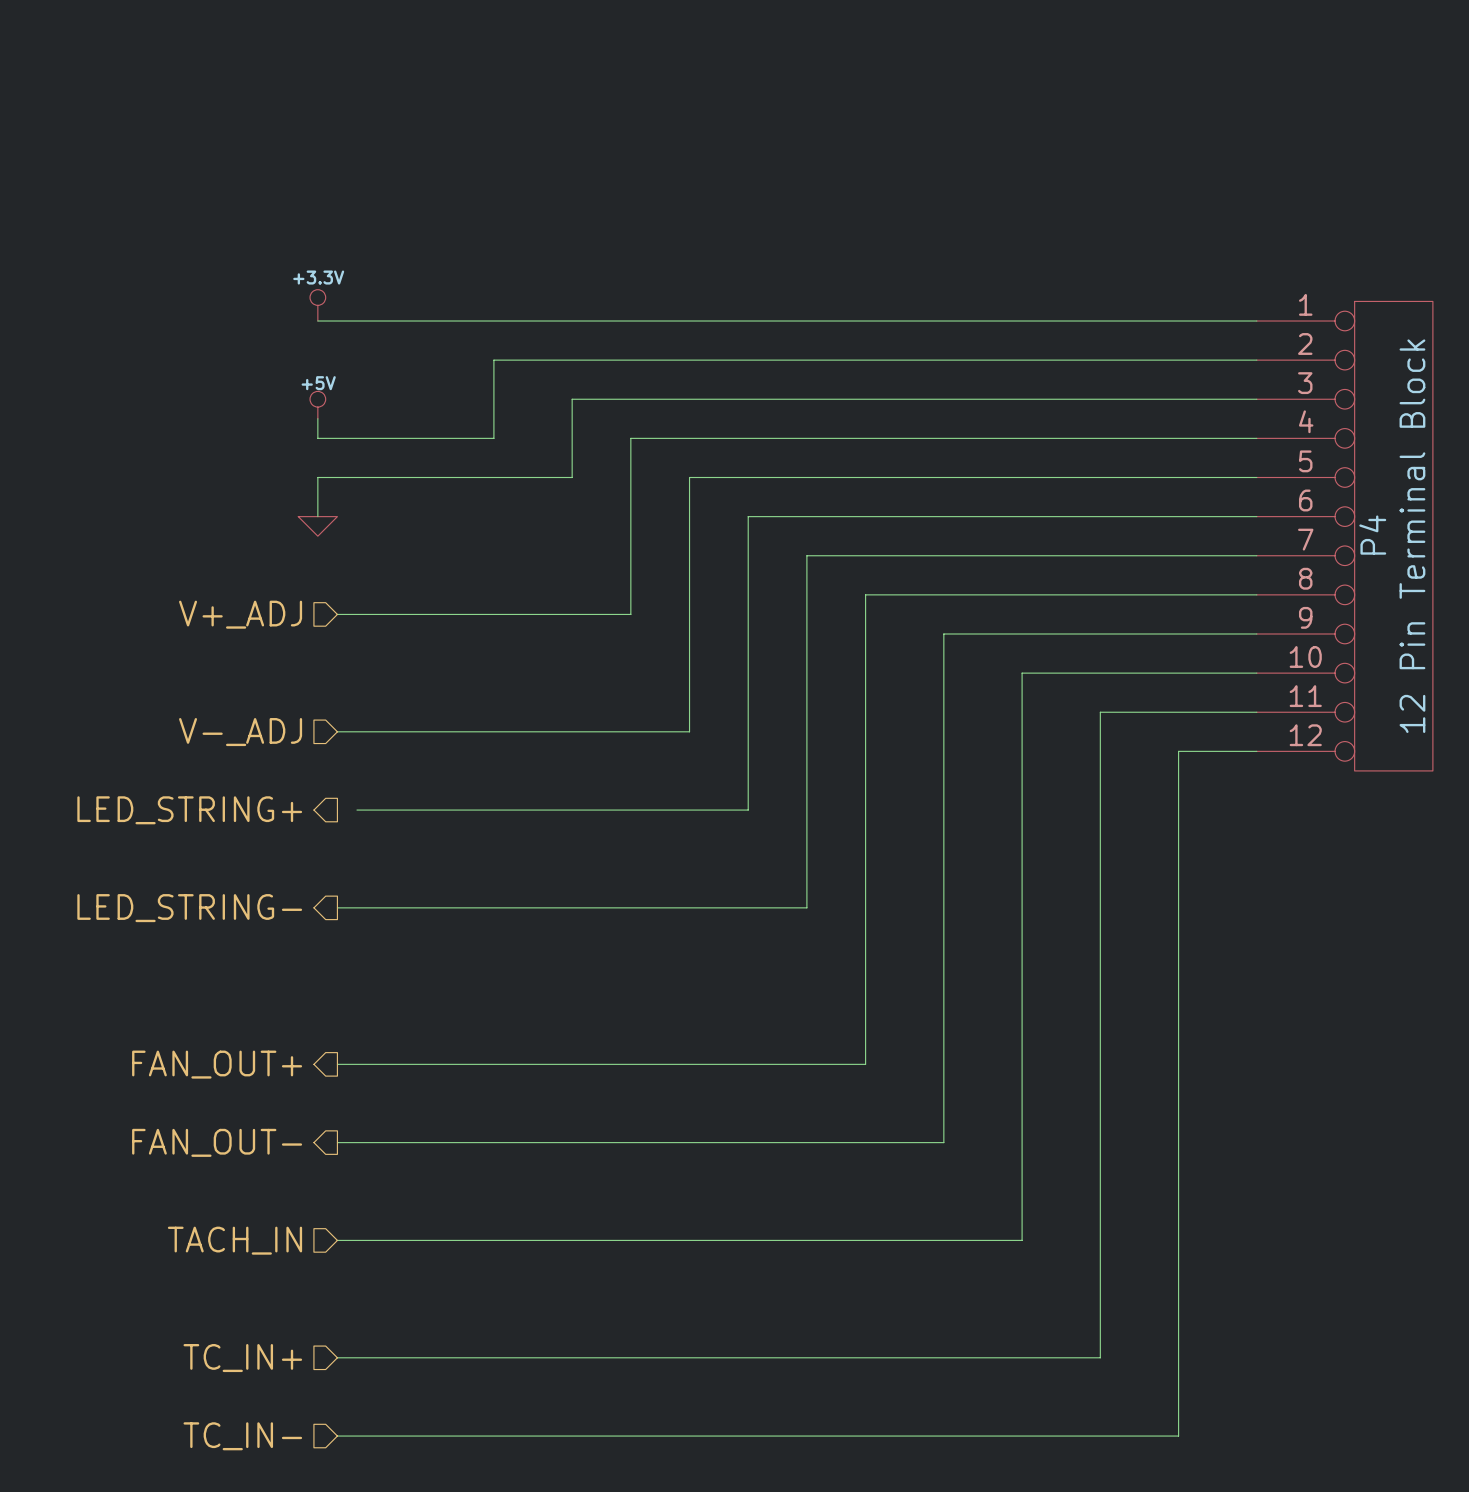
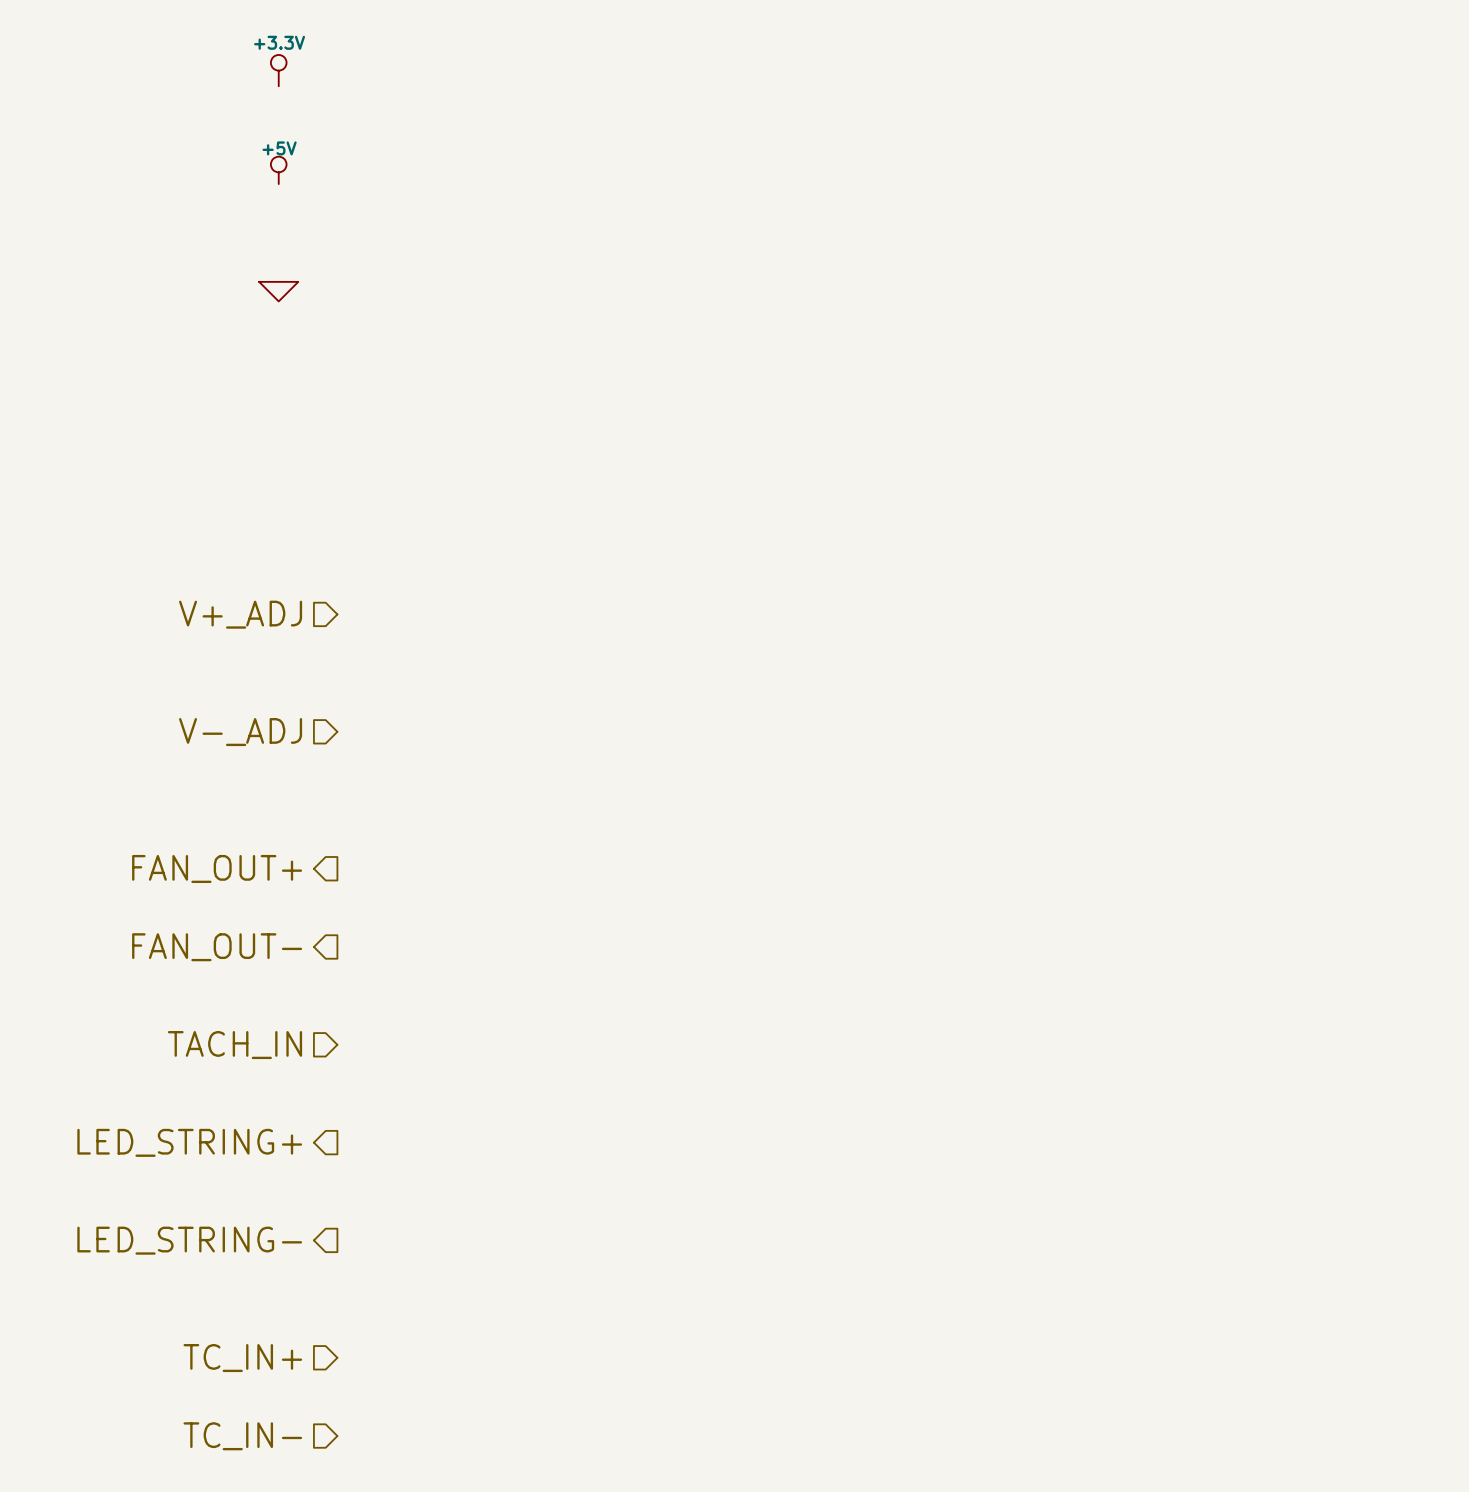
power symbol position: +3.3V (317, 305) -> +3.3V (278, 70)
wire: (317, 321) (1256, 321) -> none
wire: (1256, 360) (493, 360) (493, 438) (317, 438) (317, 418) -> none
wire: (1256, 399) (572, 399) (572, 477) (317, 477) (317, 516) -> none
power symbol position: +5V (317, 405) -> +5V (278, 170)
wire: (1256, 438) (630, 438) (630, 614) (337, 614) -> none
wire: (1256, 477) (689, 477) (689, 731) (337, 731) -> none
wire: (1256, 516) (748, 516) (748, 810) (356, 810) -> none
power symbol position: (317, 526) -> (278, 291)
P4: 12 Pin Terminal Block (1344, 536) -> none
wire: (1256, 555) (806, 555) (806, 907) (337, 907) -> none
wire: (1256, 594) (865, 594) (865, 1064) (337, 1064) -> none
wire: (1256, 633) (943, 633) (943, 1142) (337, 1142) -> none
wire: (1256, 673) (1022, 673) (1022, 1240) (337, 1240) -> none
wire: (1256, 712) (1100, 712) (1100, 1357) (337, 1357) -> none
wire: (1256, 751) (1178, 751) (1178, 1436) (337, 1436) -> none
hierarchical label: LED_STRING+ (189, 810) -> none
hierarchical label: LED_STRING- (189, 908) -> none
hierarchical label: none -> FAN_OUT- (217, 947)
hierarchical label: none -> TACH_IN (234, 1045)
hierarchical label position: FAN_OUT+ (217, 1064) -> FAN_OUT+ (217, 868)
hierarchical label: FAN_OUT- (217, 1142) -> LED_STRING+ (189, 1142)
hierarchical label shape: input (234, 1240) -> output (189, 1240)
hierarchical label: TACH_IN (234, 1240) -> LED_STRING- (189, 1240)

